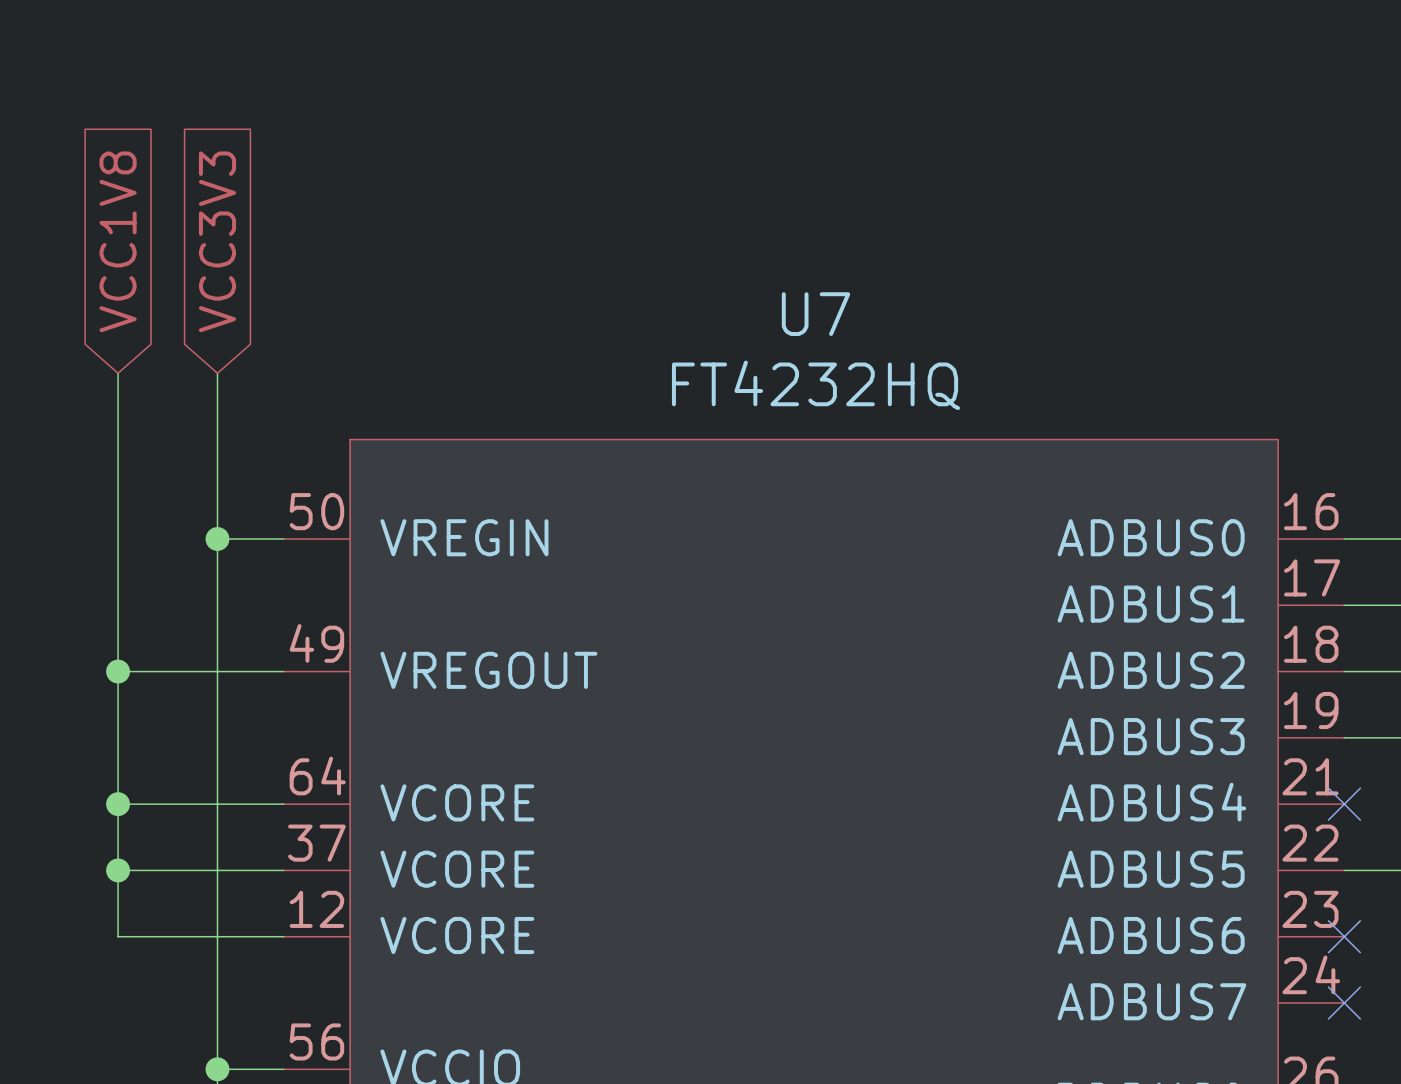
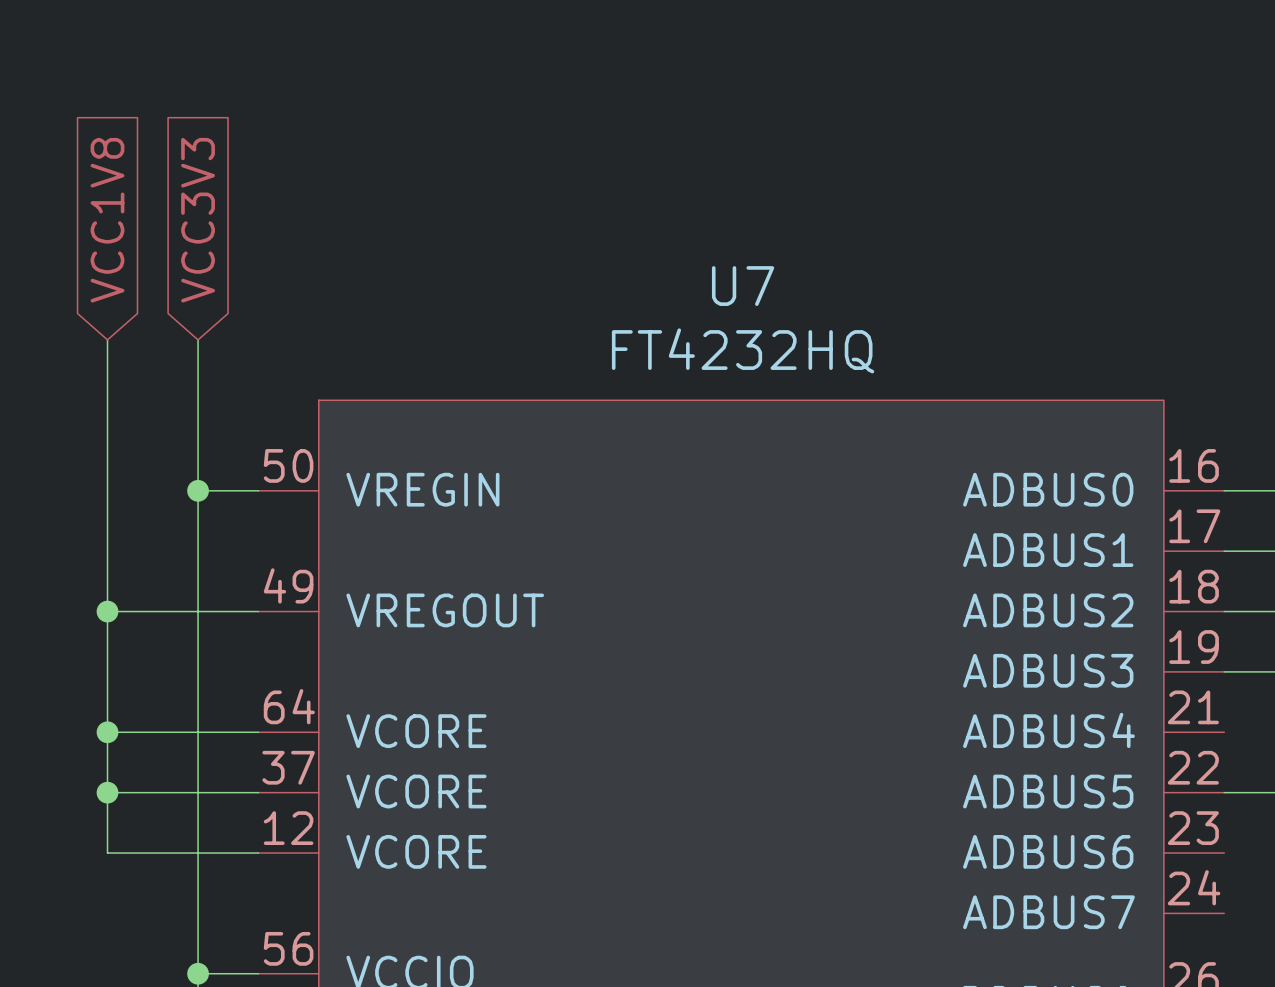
no-connect mark: (1344, 804) -> none
no-connect mark: (1344, 936) -> none
no-connect mark: (1344, 1003) -> none

